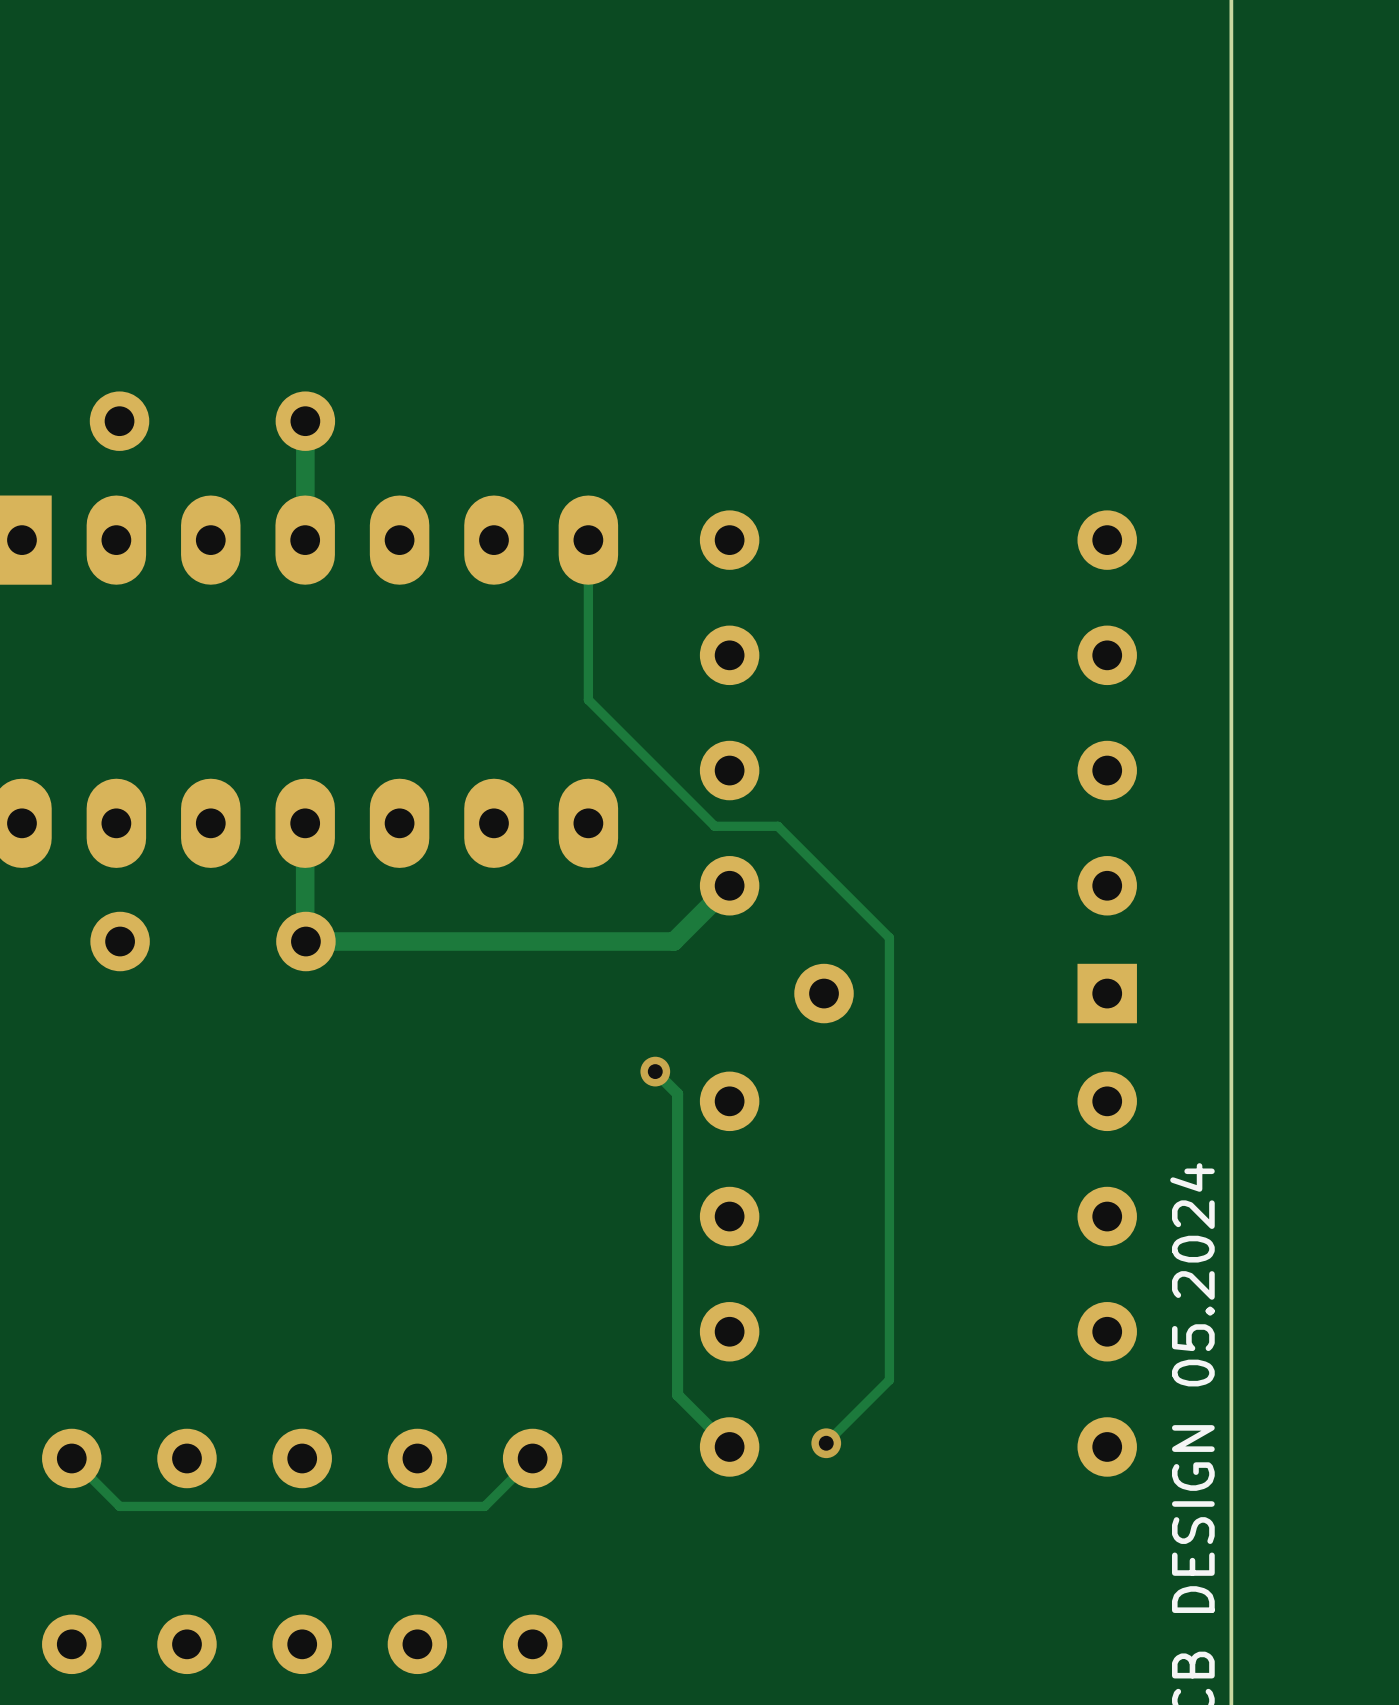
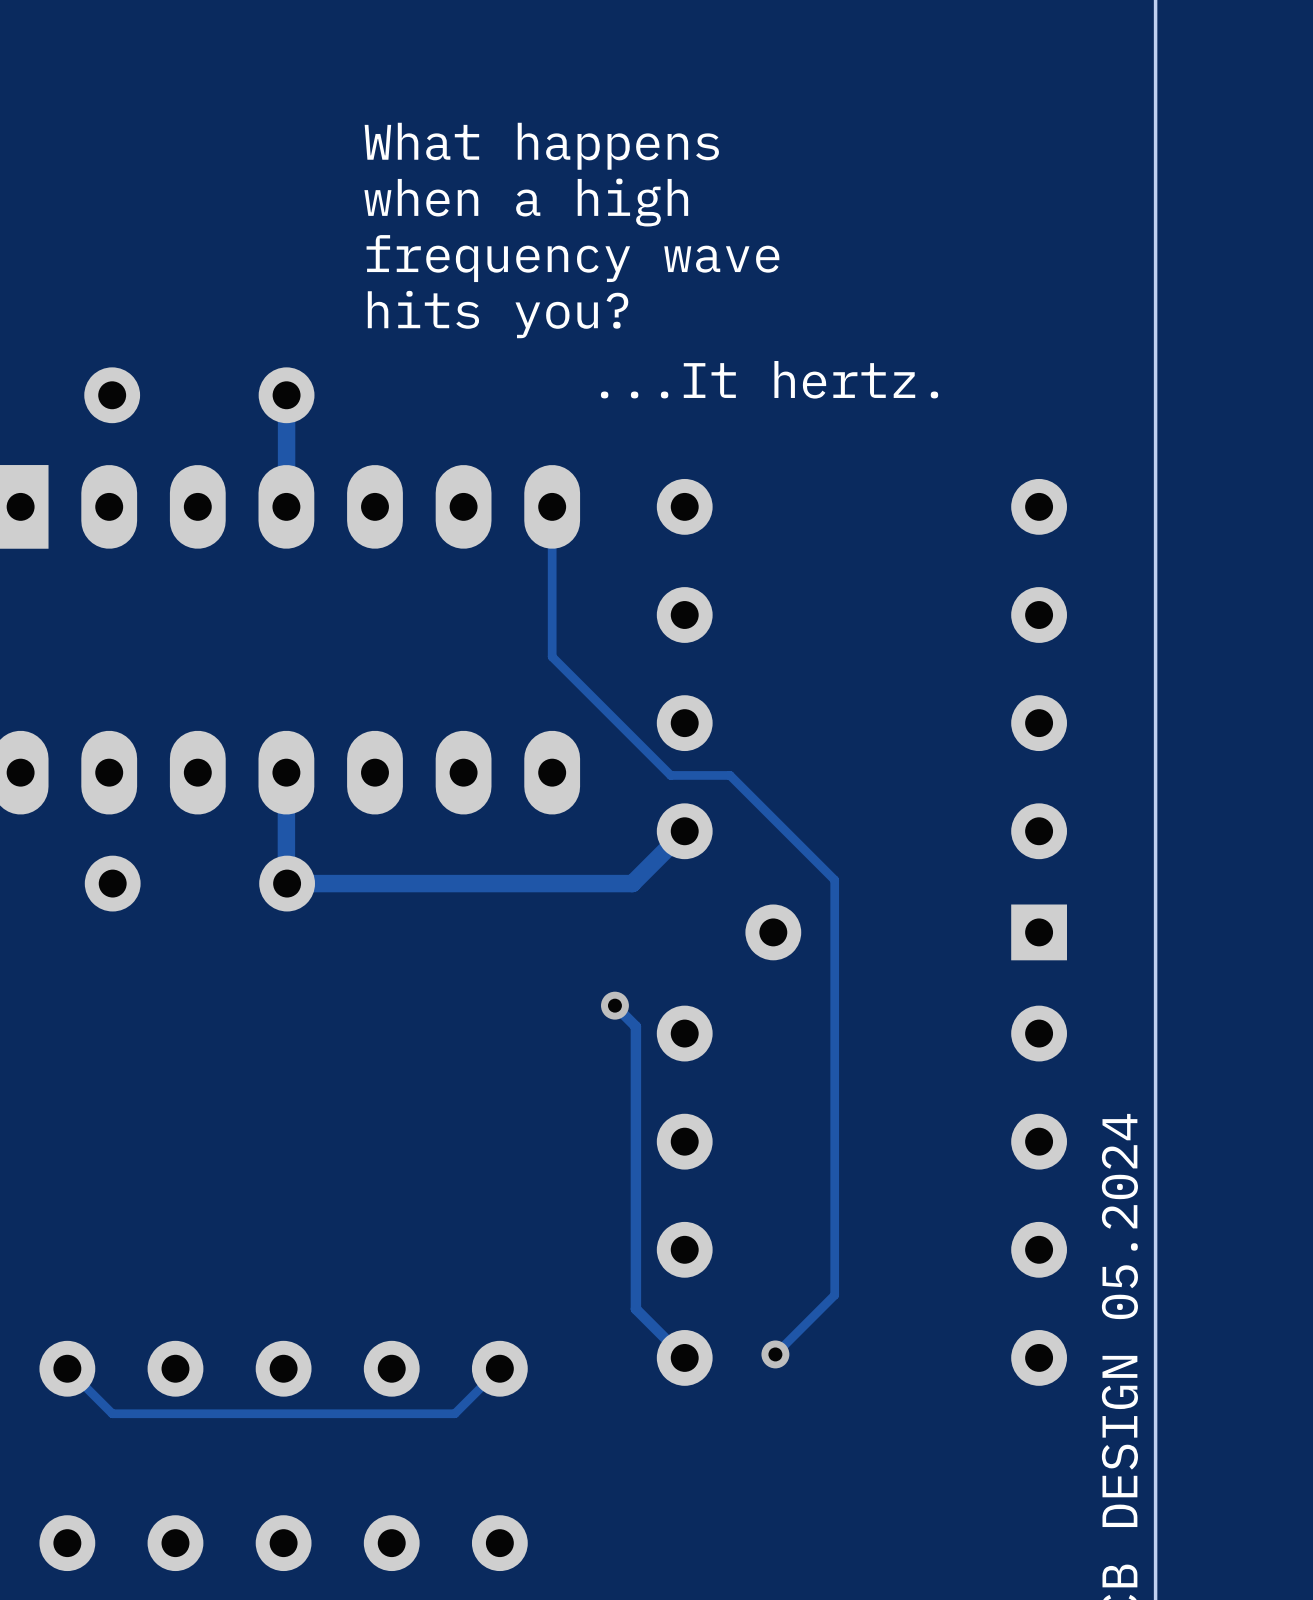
text: none -> What happens (541, 146)
text: none -> when a high (526, 202)
text: none -> frequency wave (572, 258)
text: none -> hits you? (498, 314)
text: none -> ...It hertz. (769, 379)

